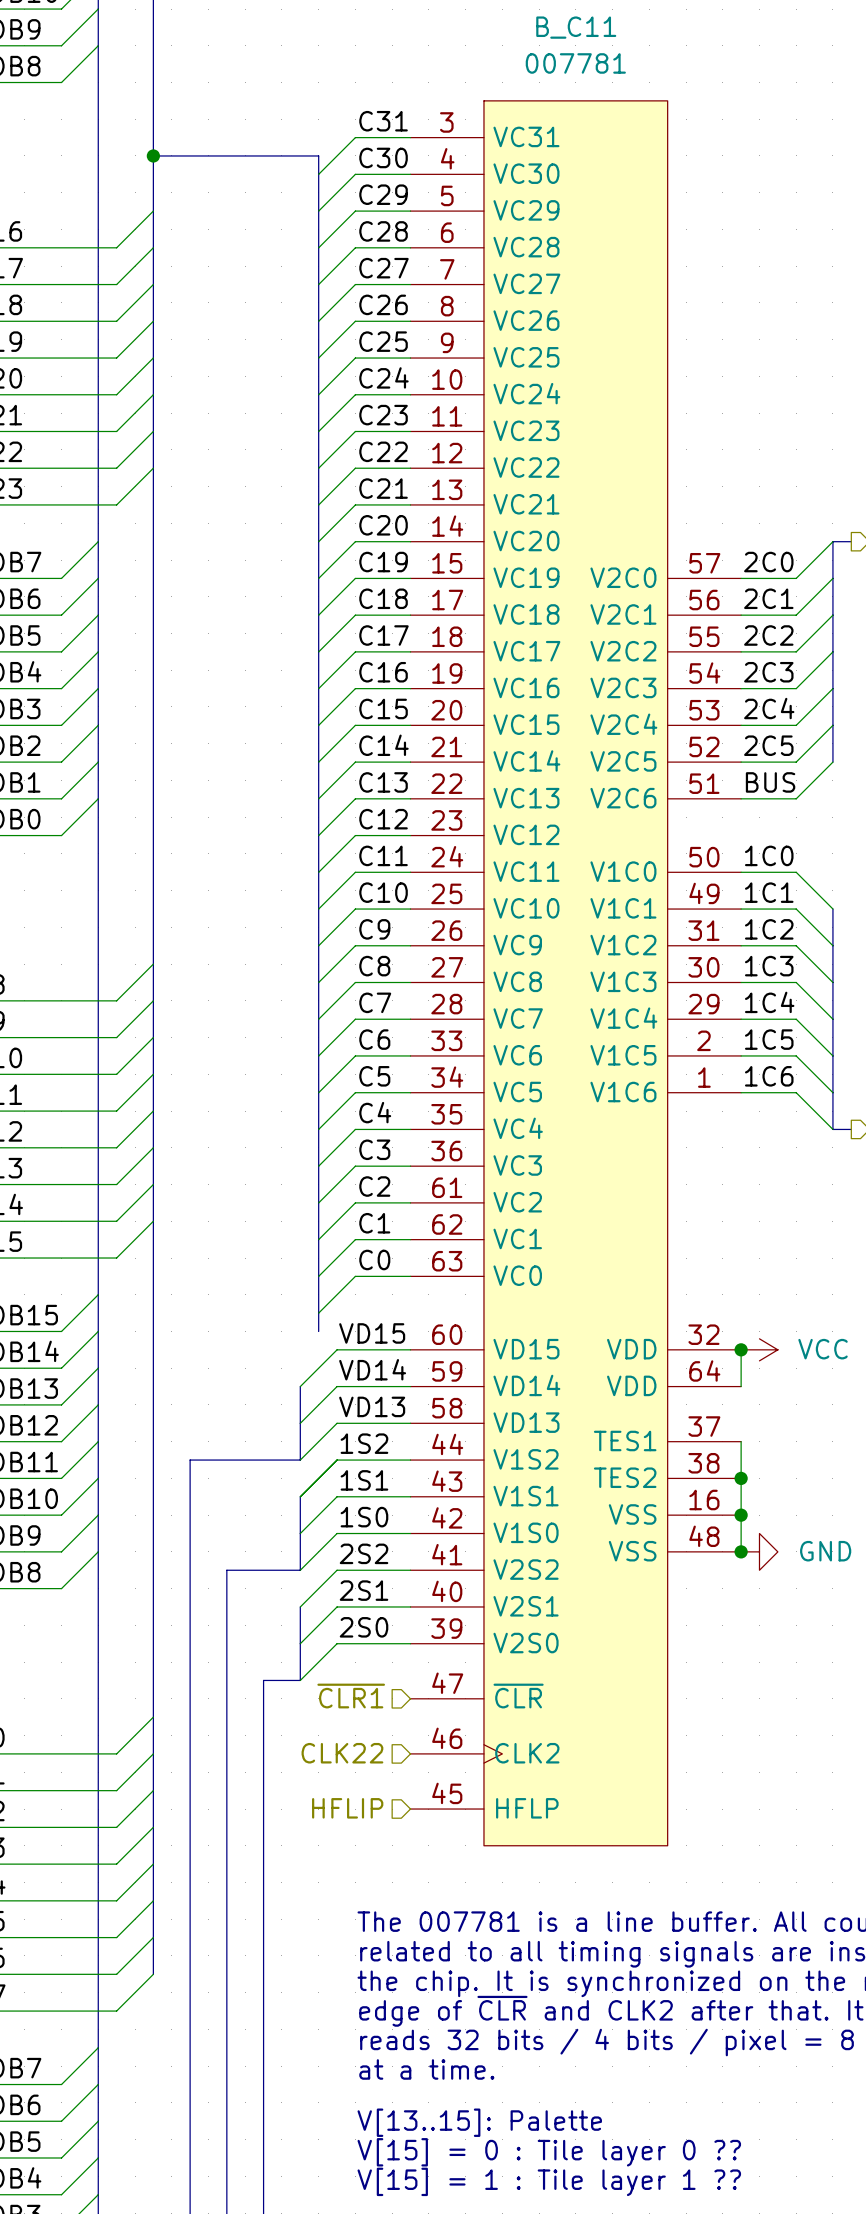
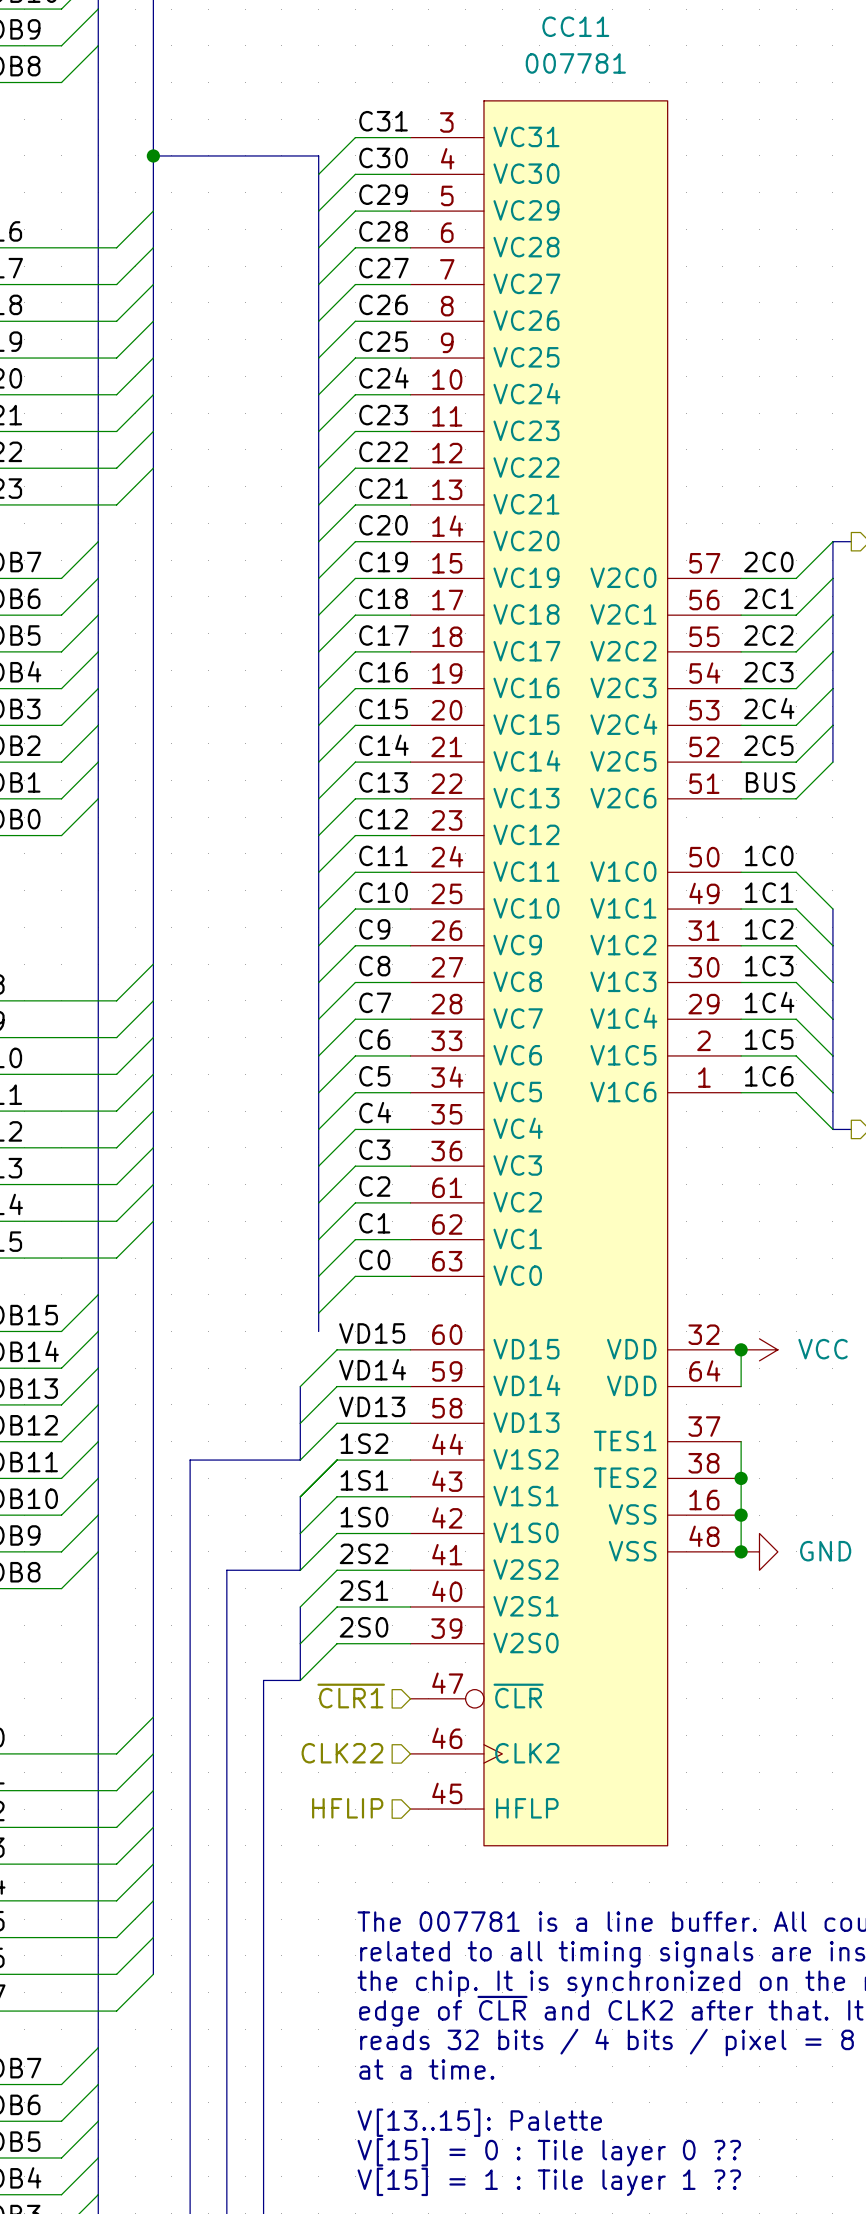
B_C11: 007781 (575, 973) -> none
CC11: none -> 007781 (575, 973)

